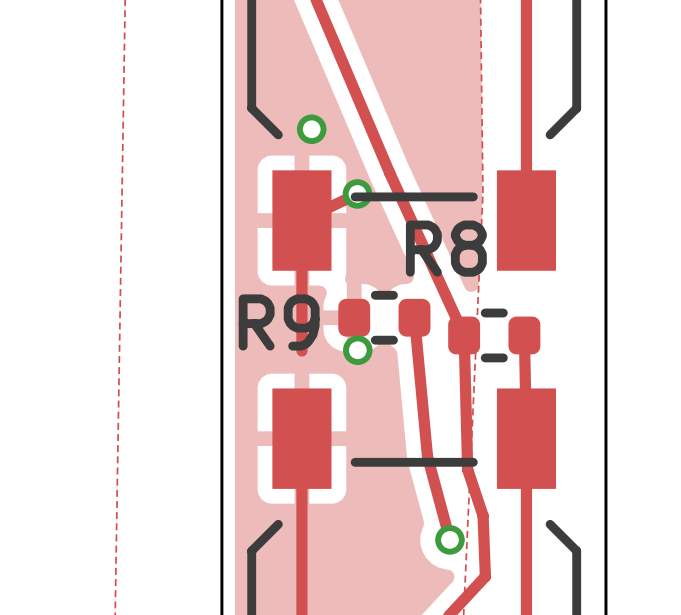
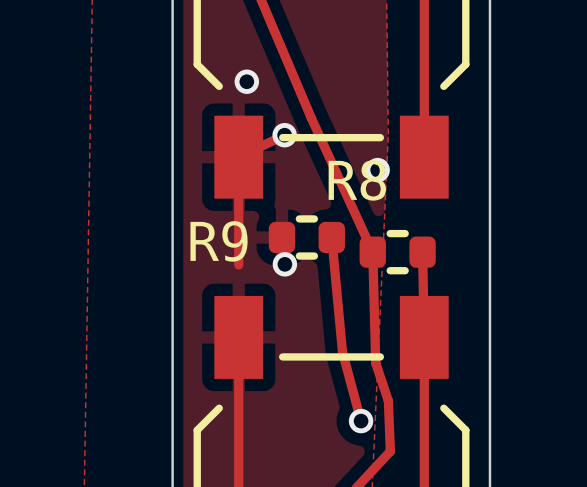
via: none -> (377, 170)

